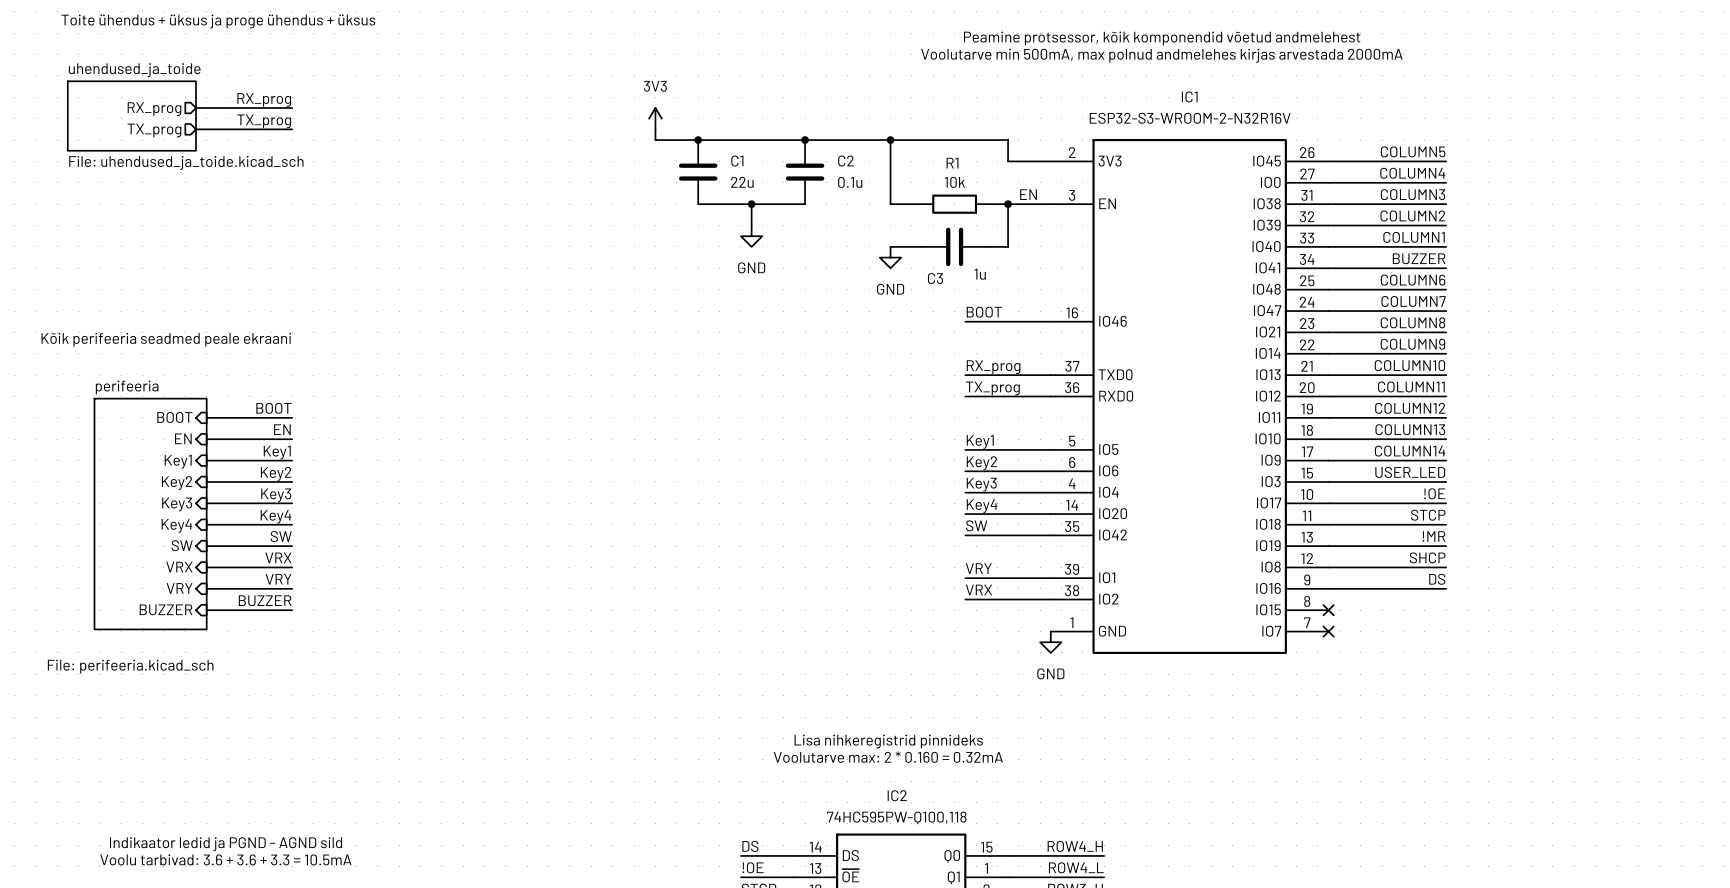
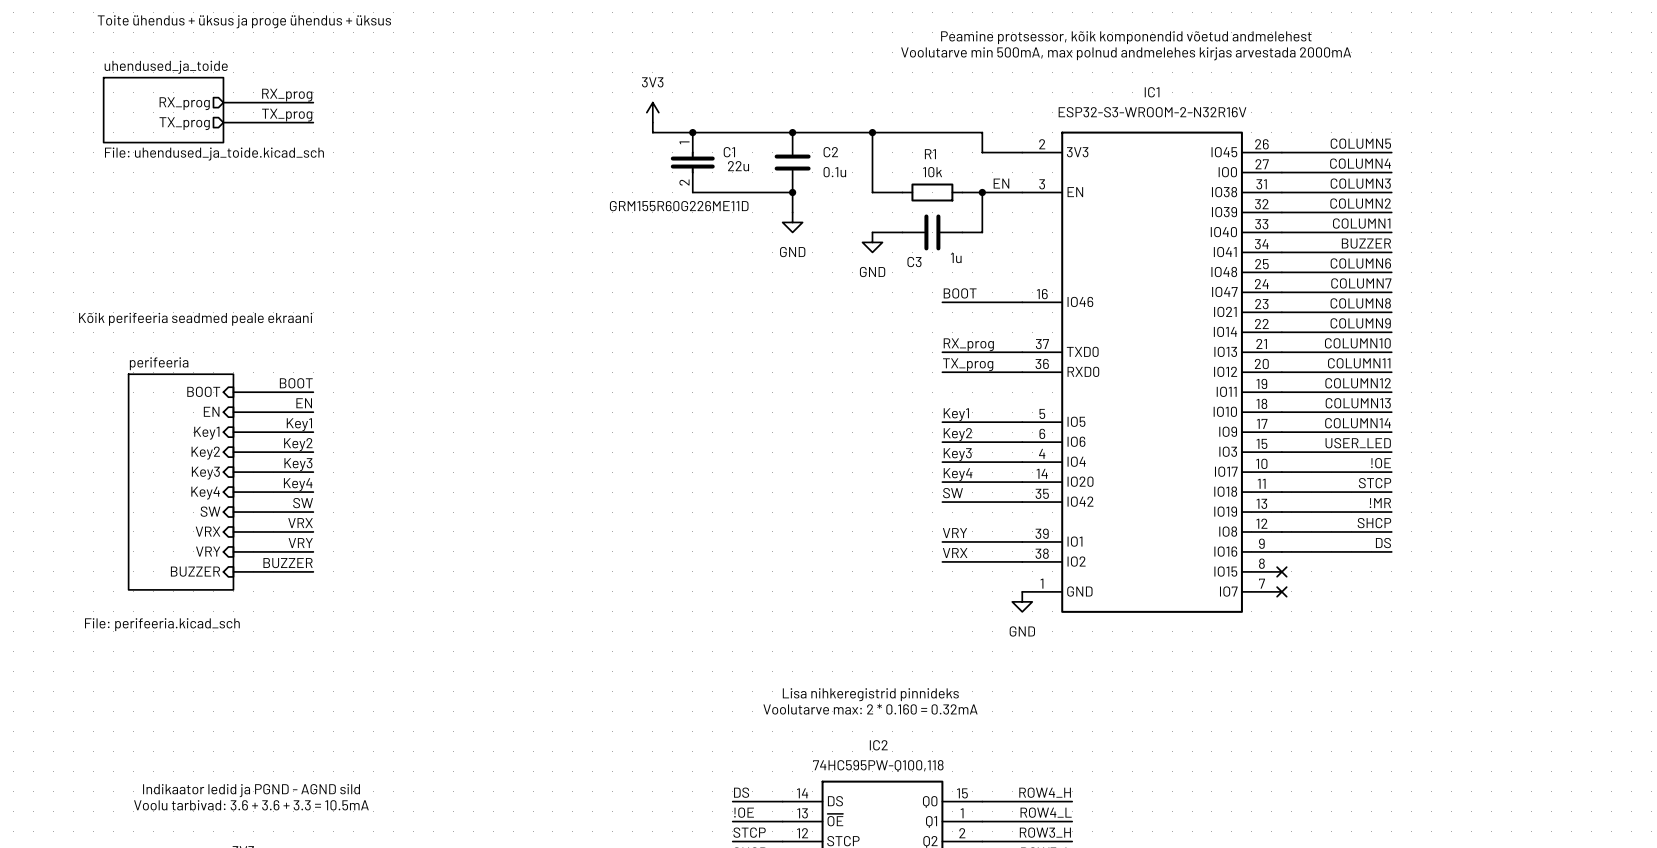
C1 symbol: [678, 140, 718, 205] -> [670, 132, 715, 193]
text: none -> 22u (738, 166)
C1 value: 22u (742, 182) -> GRM155R60G226ME11D (679, 206)
wire: (751, 204) (751, 225) -> (792, 192) (792, 212)
junction: (751, 204) -> none
junction: none -> (792, 192)
power symbol position: GND (751, 236) -> GND (792, 222)

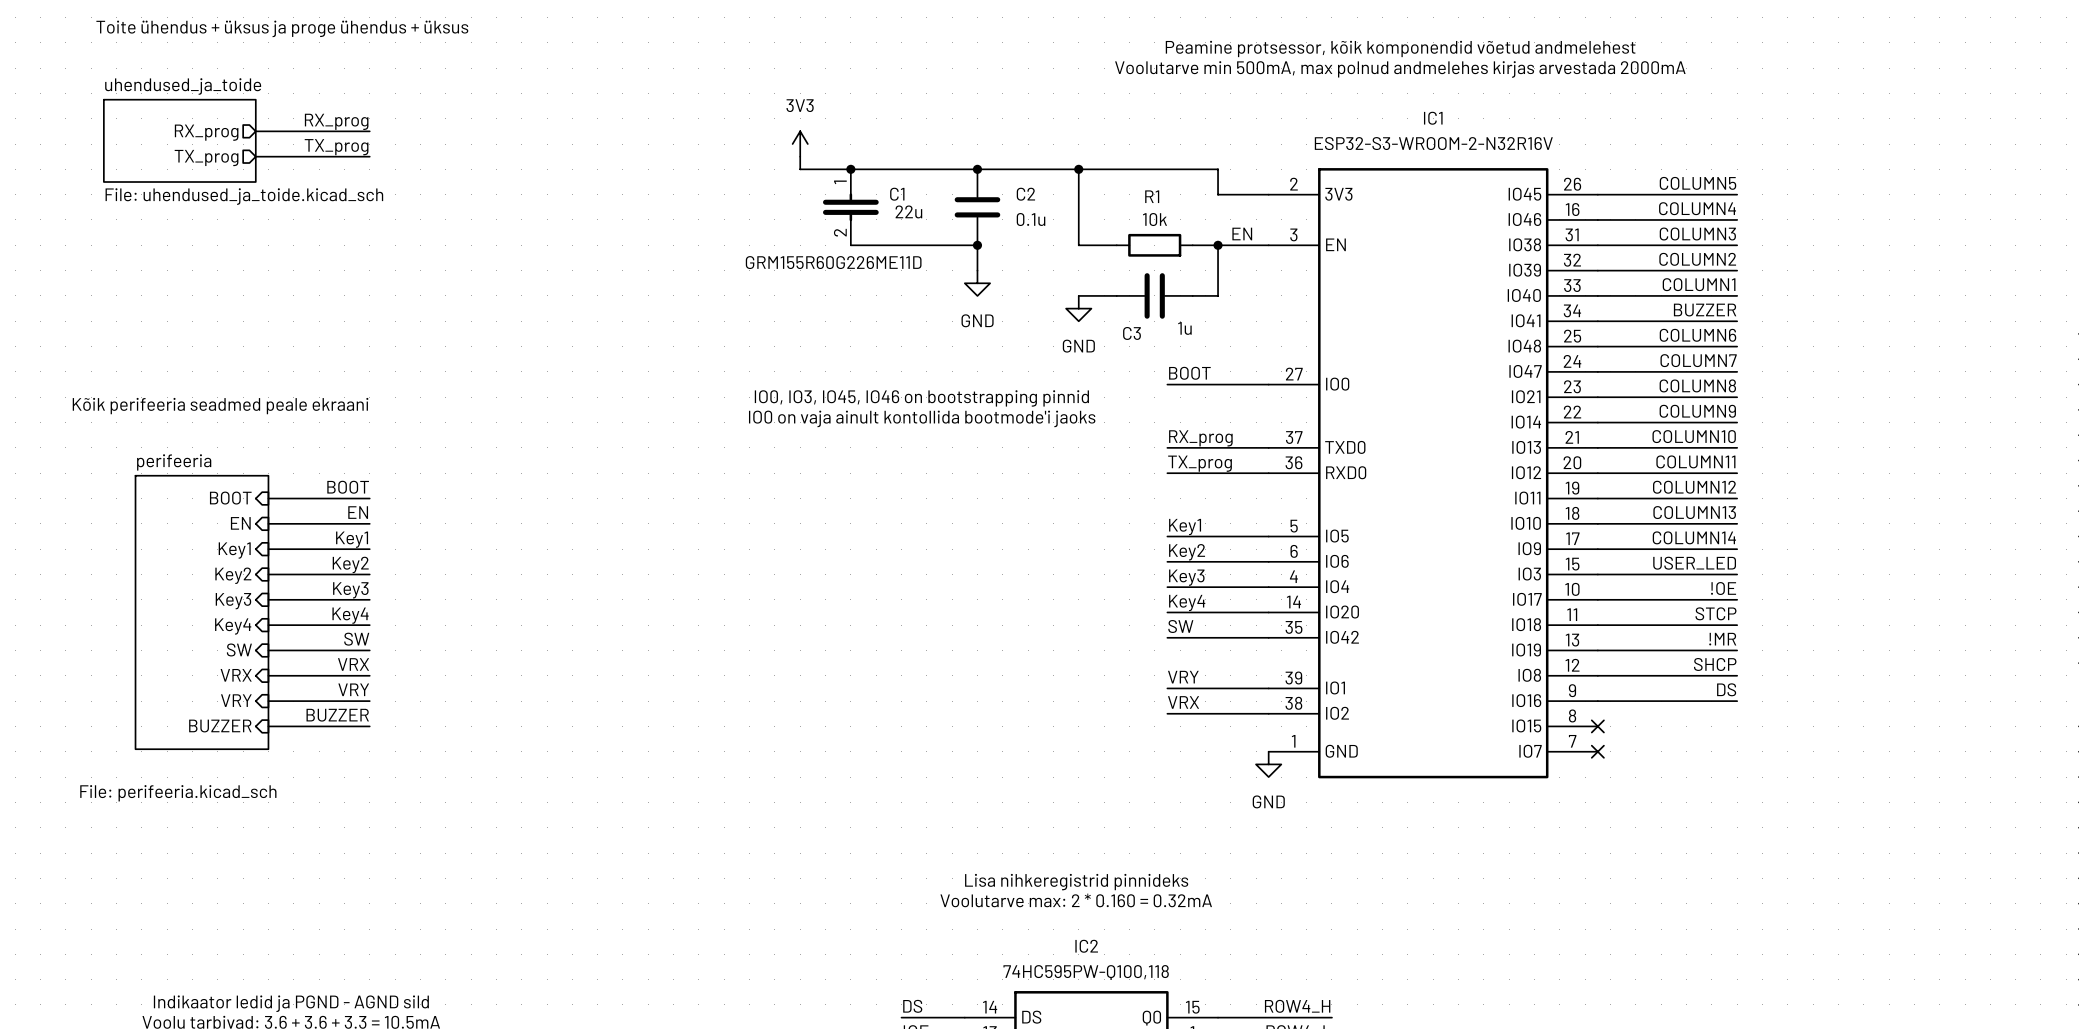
IC1 pin number: 27 (1262, 164) -> 16 (1572, 209)
IC1 pin name: IO0 (1227, 172) -> IO46 (1524, 219)
IC1 pin number: 16 (1042, 294) -> 27 (1294, 374)
IC1 pin name: IO46 (1080, 301) -> IO0 (1337, 384)
text: none -> IO0, IO3, IO45, IO46 on bootstrapping pinnid (921, 398)
text: none -> IO0 on vaja ainult kontollida bootmode'i jaoks (922, 418)

